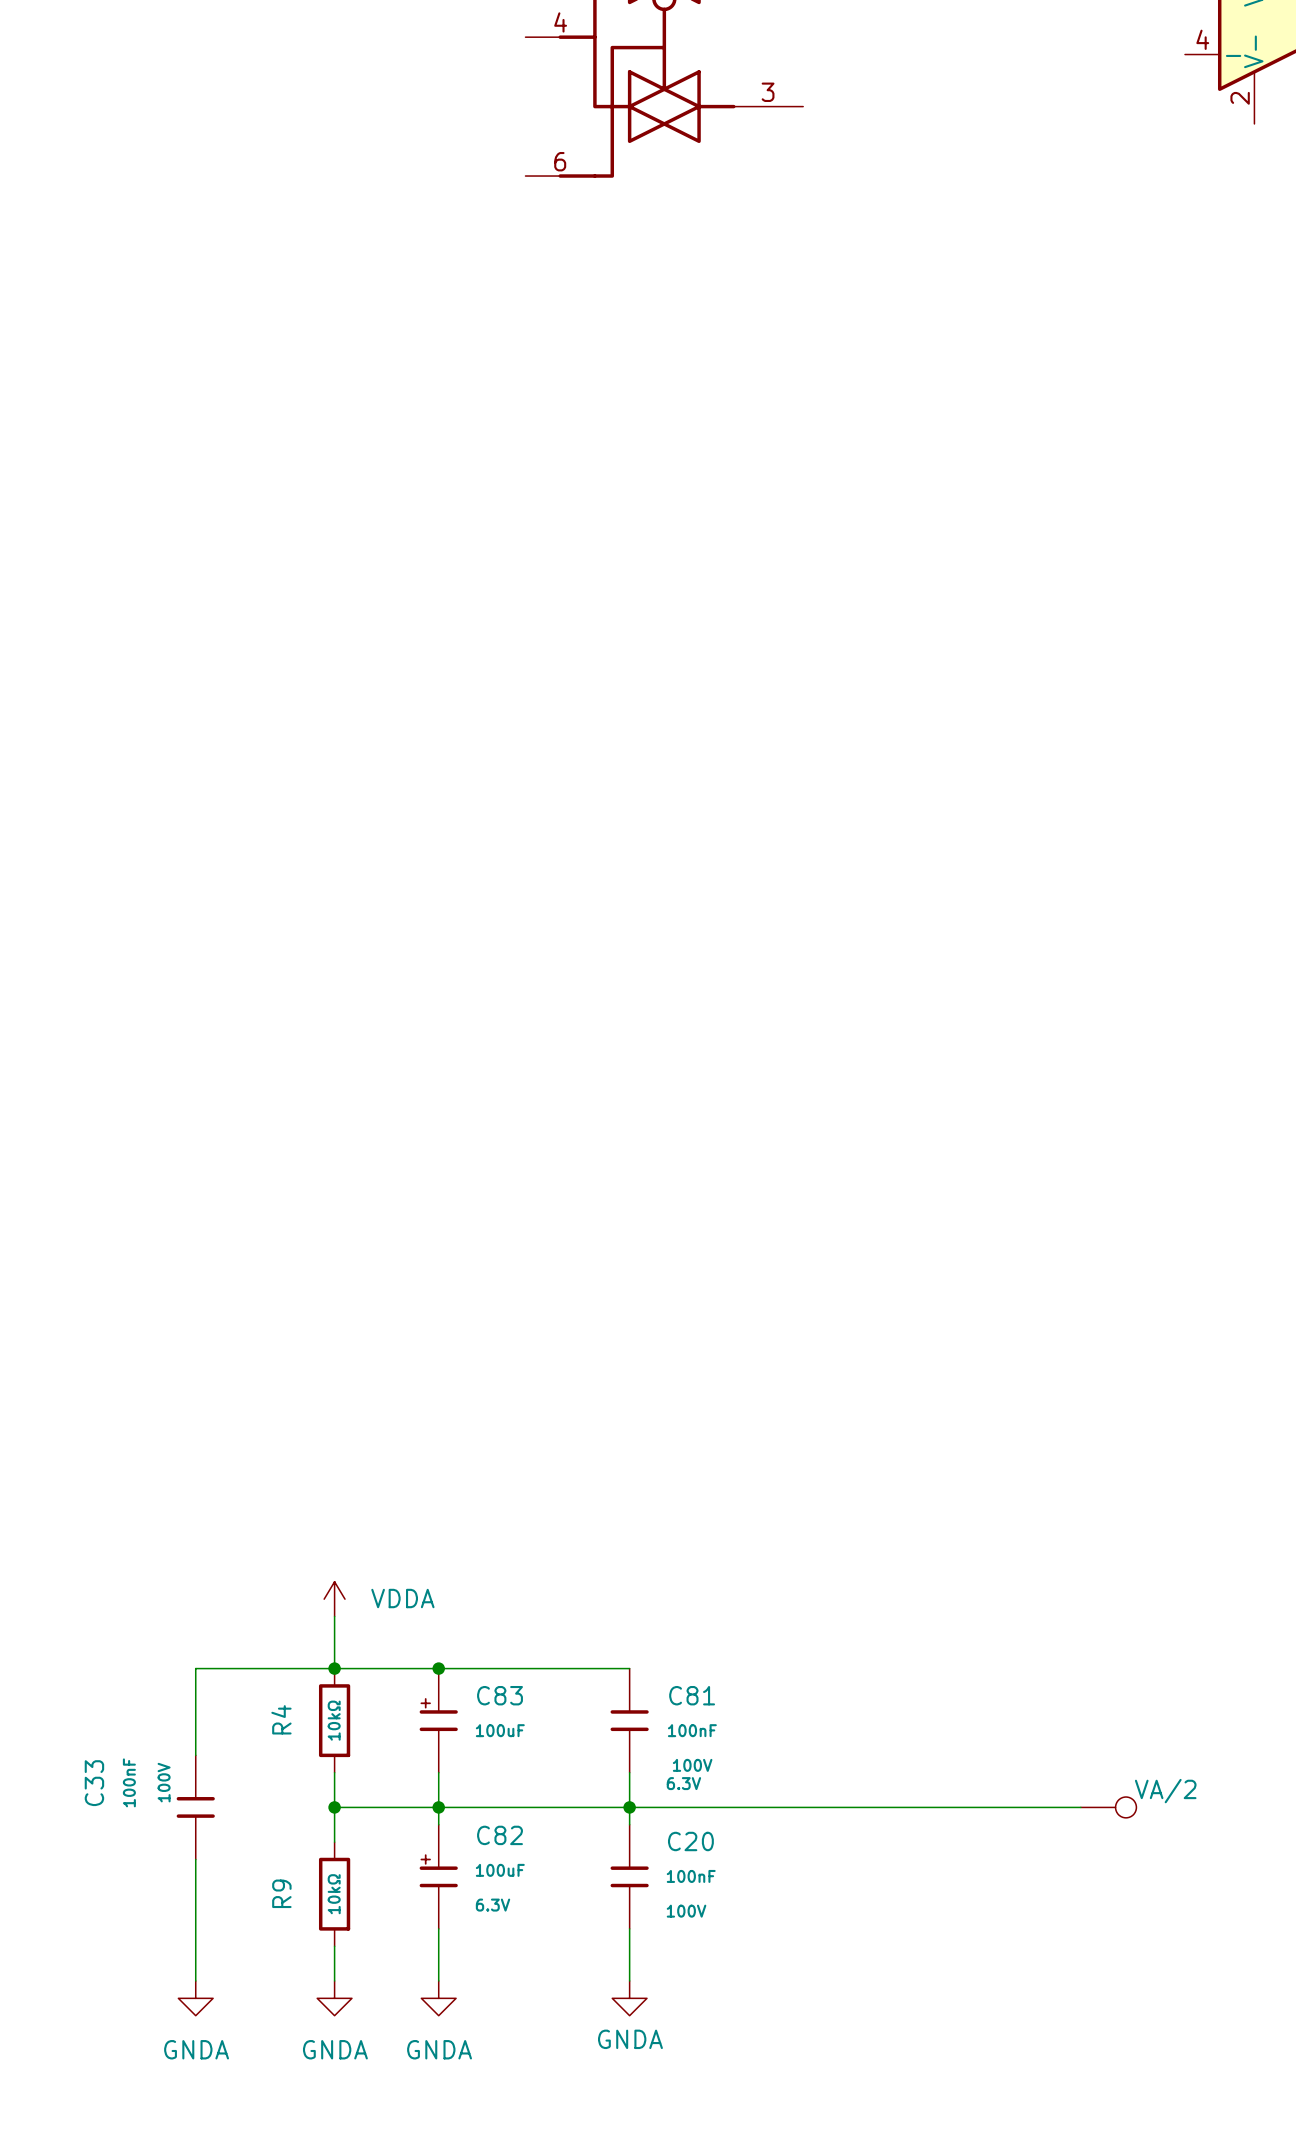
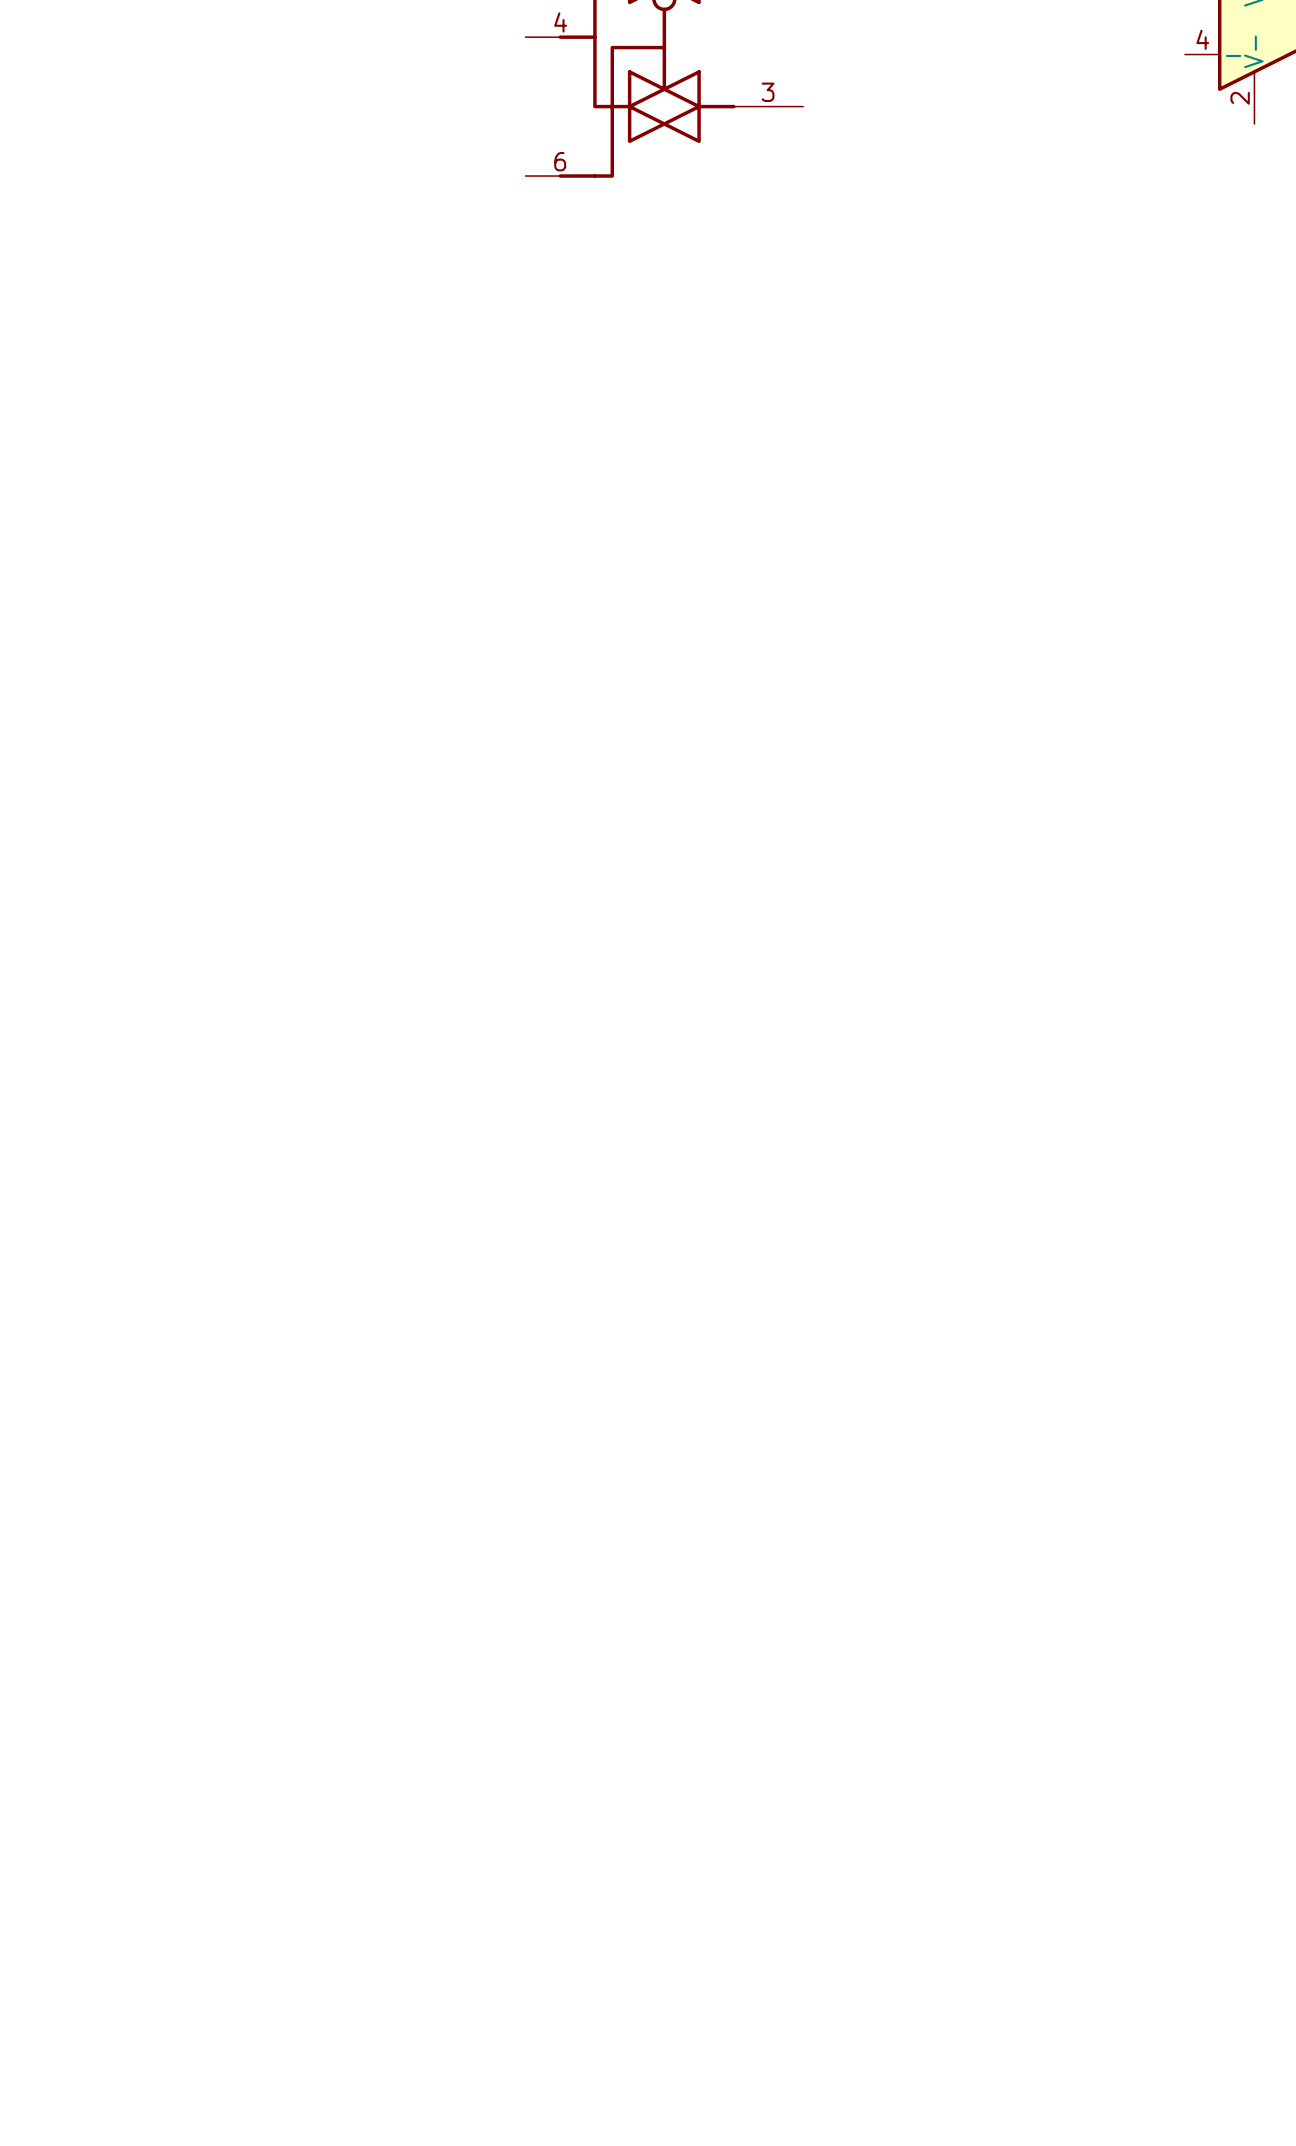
power symbol: VDDA (334, 1599) -> none
wire: (334, 1616) (334, 1668) -> none
junction: (334, 1668) -> none
junction: (438, 1668) -> none
wire: (629, 1668) (195, 1668) (195, 1755) -> none
R4: 10kΩ (334, 1720) -> none
C83: 100uF (438, 1720) -> none
C81: 100nF (629, 1720) -> none
wire: (334, 1772) (334, 1842) -> none
wire: (438, 1772) (438, 1824) -> none
wire: (629, 1772) (629, 1824) -> none
C33: 100nF (195, 1807) -> none
wire: (334, 1807) (1080, 1807) -> none
junction: (334, 1807) -> none
junction: (438, 1807) -> none
junction: (629, 1807) -> none
part: VA/2 (1108, 1807) -> none
wire: (195, 1859) (195, 1980) -> none
C82: 100uF (438, 1876) -> none
C20: 100nF (629, 1876) -> none
R9: 10kΩ (334, 1894) -> none
wire: (438, 1928) (438, 1980) -> none
wire: (629, 1928) (629, 1980) -> none
wire: (334, 1946) (334, 1980) -> none
power symbol: GNDA (195, 1998) -> none
power symbol: GNDA (334, 1998) -> none
power symbol: GNDA (438, 1998) -> none
power symbol: GNDA (629, 1998) -> none

